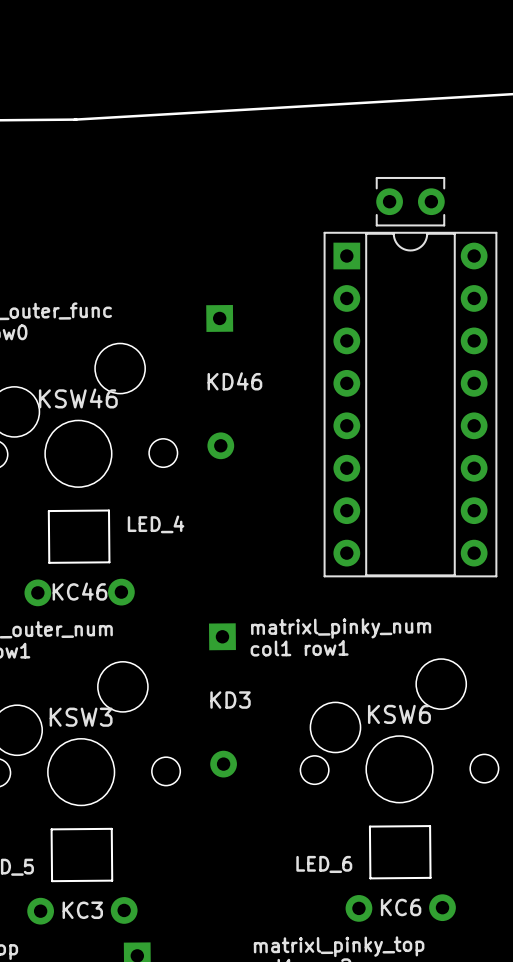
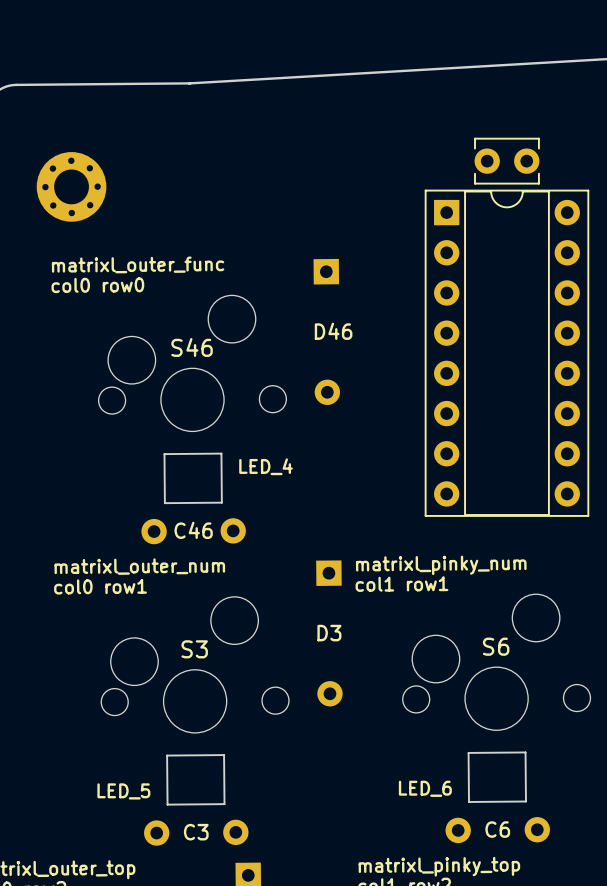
text: KD46 (234, 381) -> D46 (333, 331)
KSW46 name: KSW46 (78, 398) -> S46 (192, 347)
text: KC46 (79, 591) -> C46 (193, 530)
text: KD3 (230, 700) -> D3 (329, 633)
KSW6 name: KSW6 (399, 714) -> S6 (496, 646)
KSW3 name: KSW3 (81, 717) -> S3 (194, 649)
text: KC6 (401, 907) -> C6 (497, 829)
text: KC3 (82, 910) -> C3 (196, 832)

